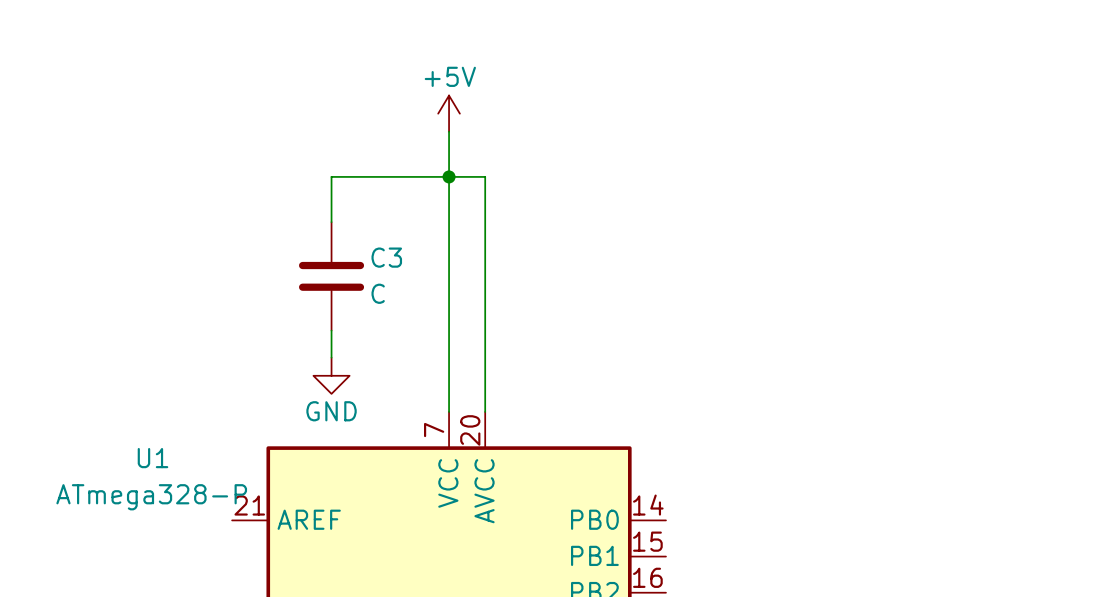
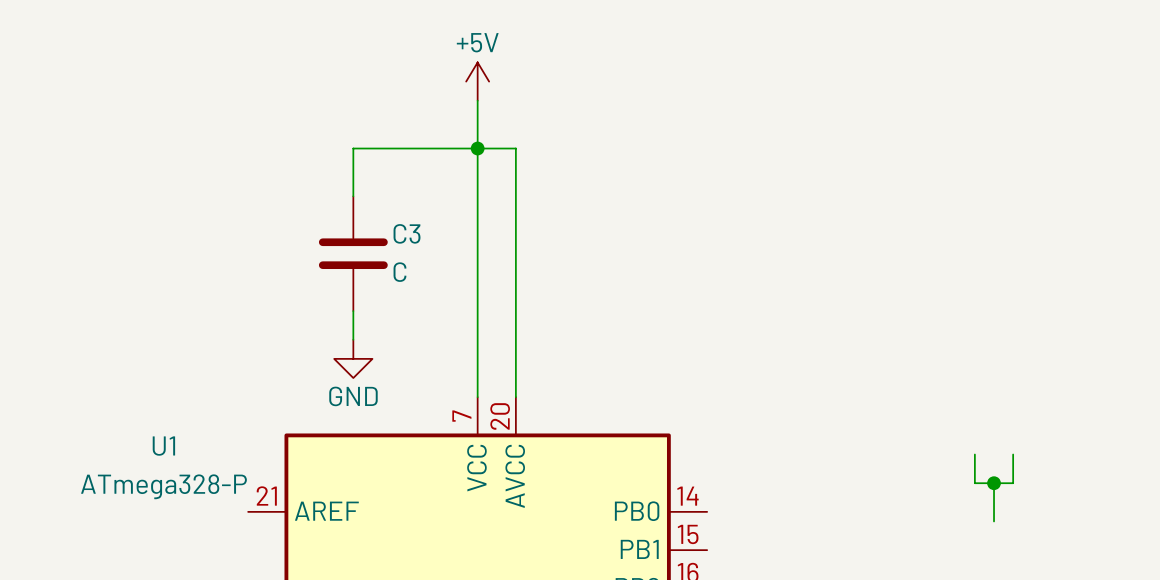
wire: none -> (974, 454) (974, 483) (1013, 483) (1013, 454)
wire: none -> (994, 483) (994, 521)
junction: none -> (994, 483)

